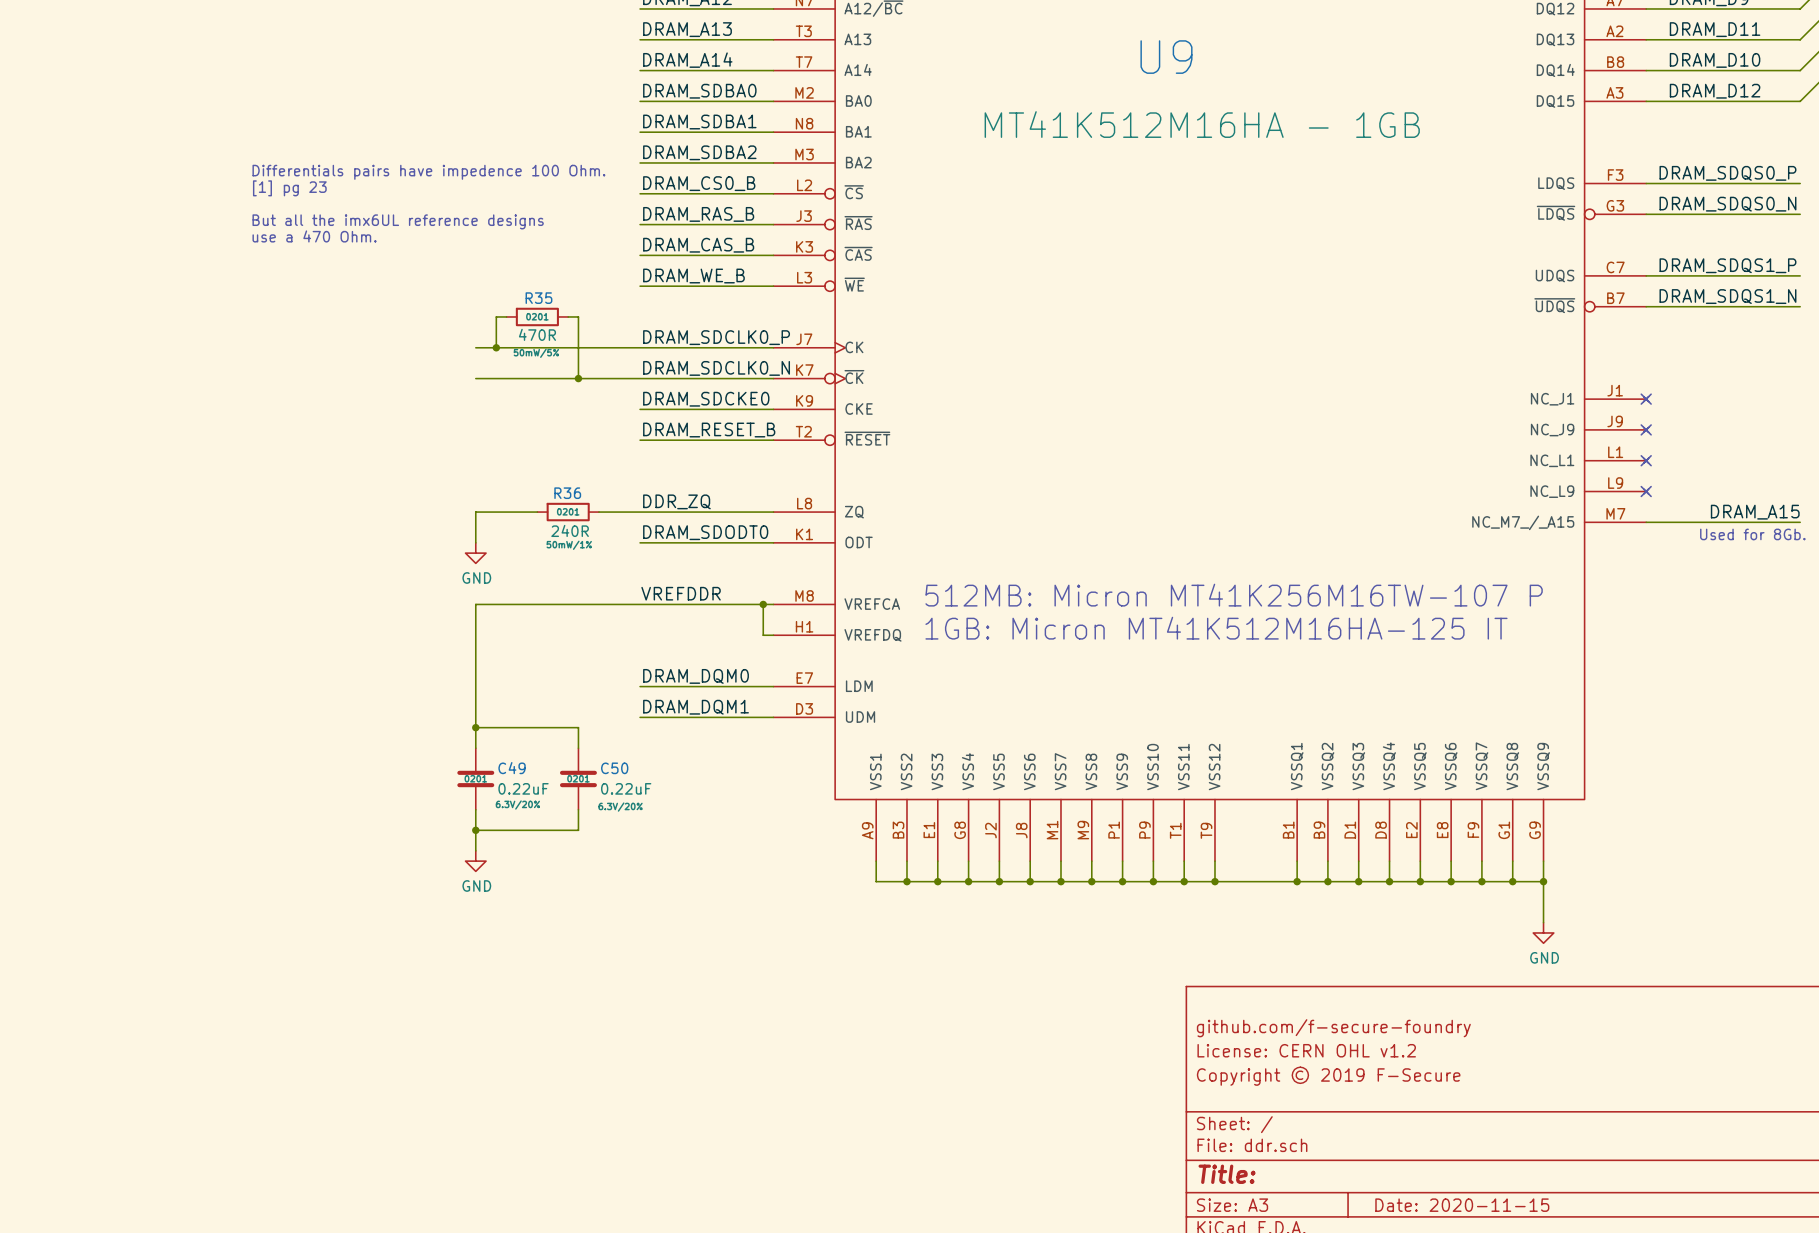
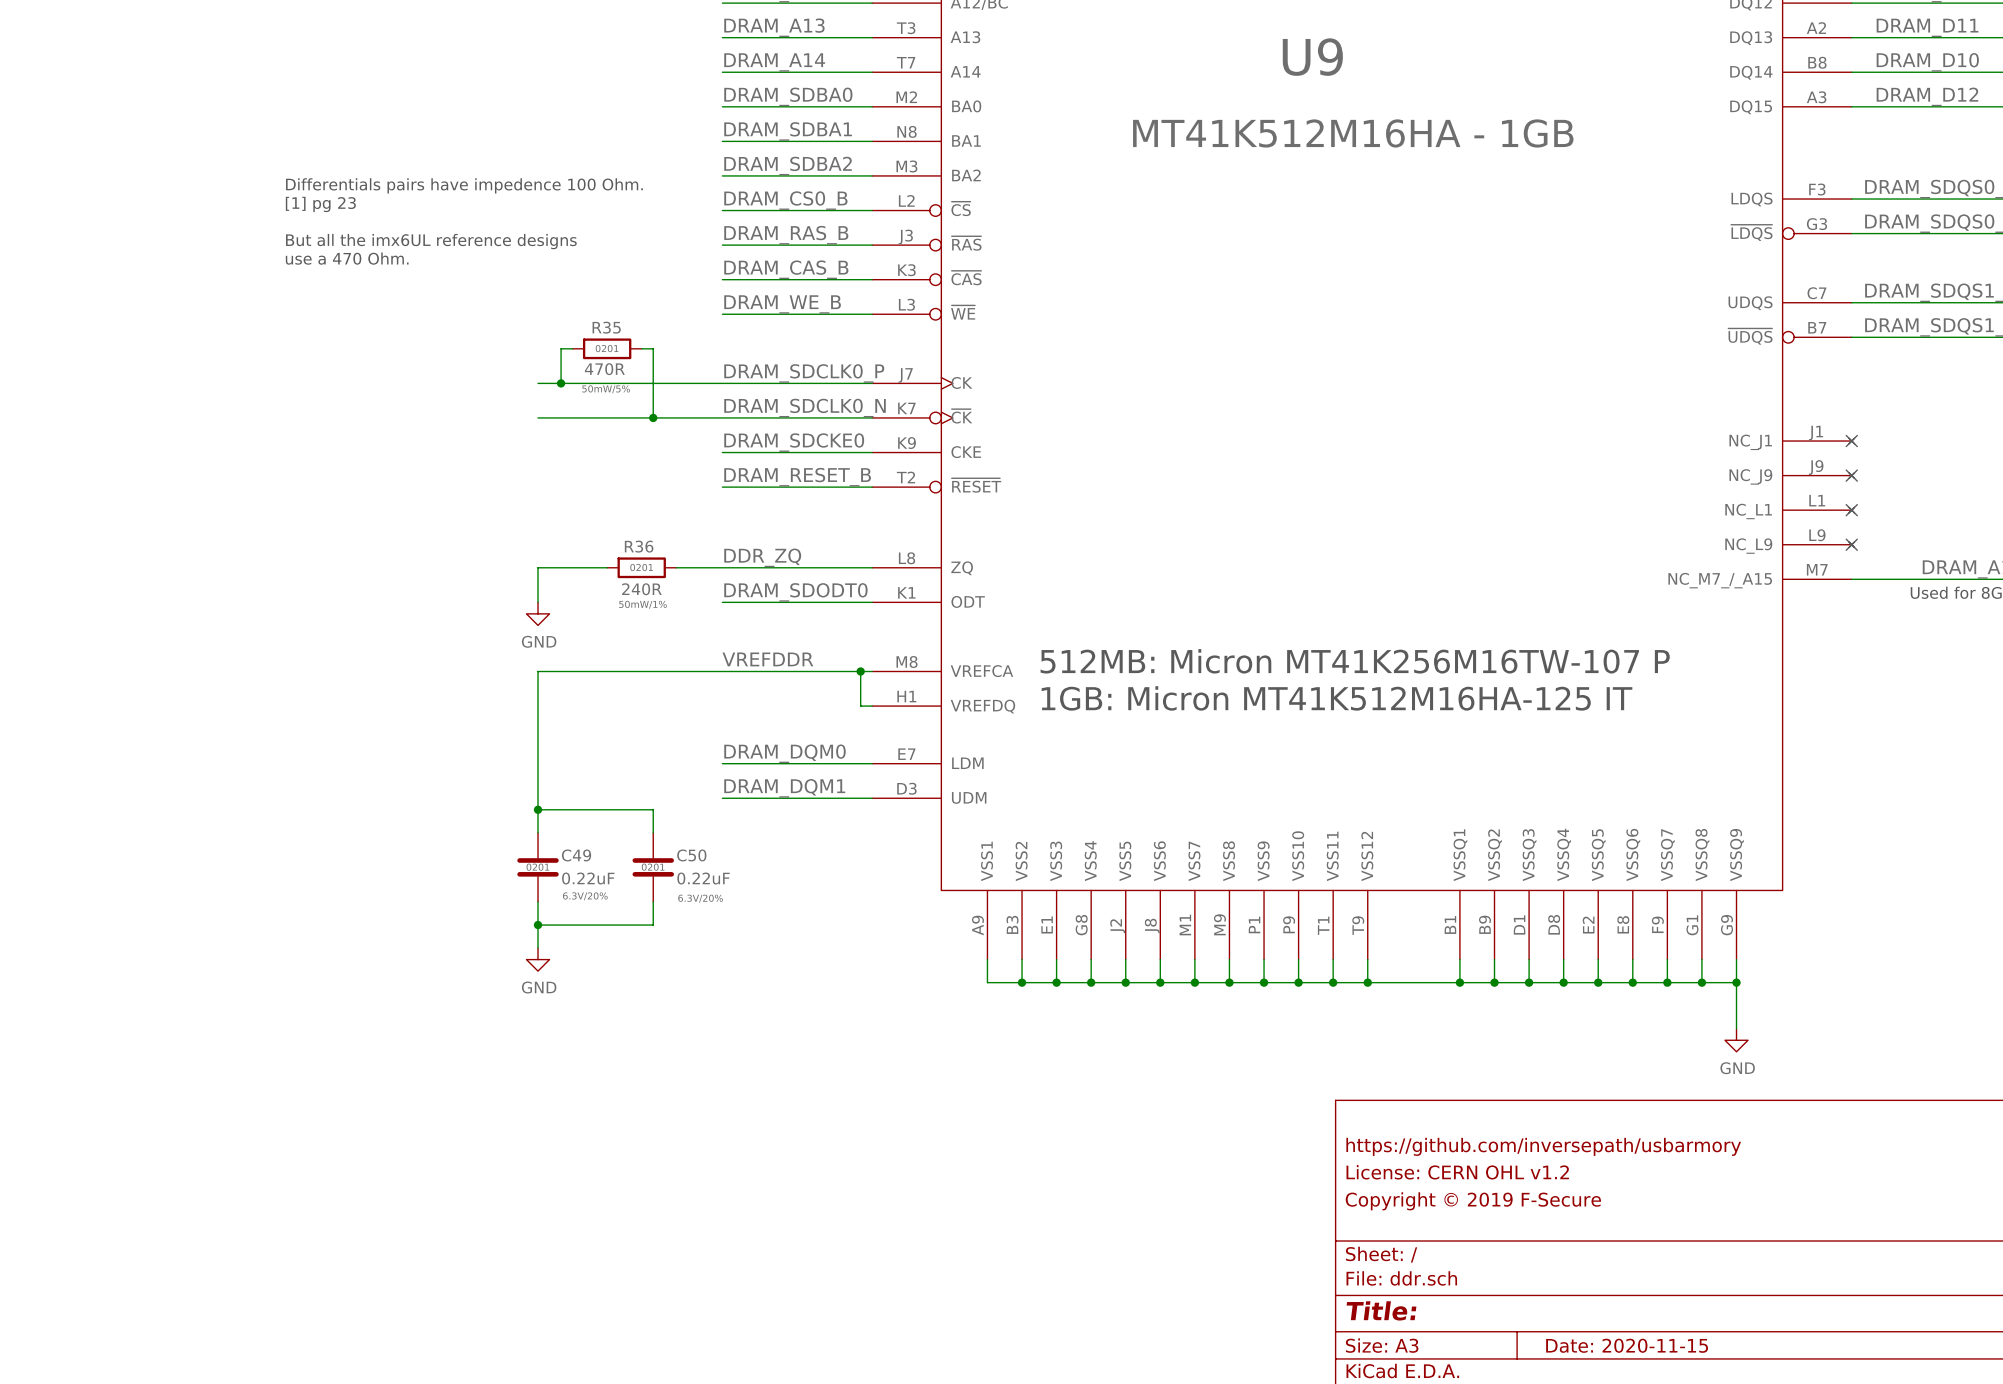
title block: github.com/f-secure-foundry (1333, 1028) -> https://github.com/inversepath/usbarmory (1543, 1146)

